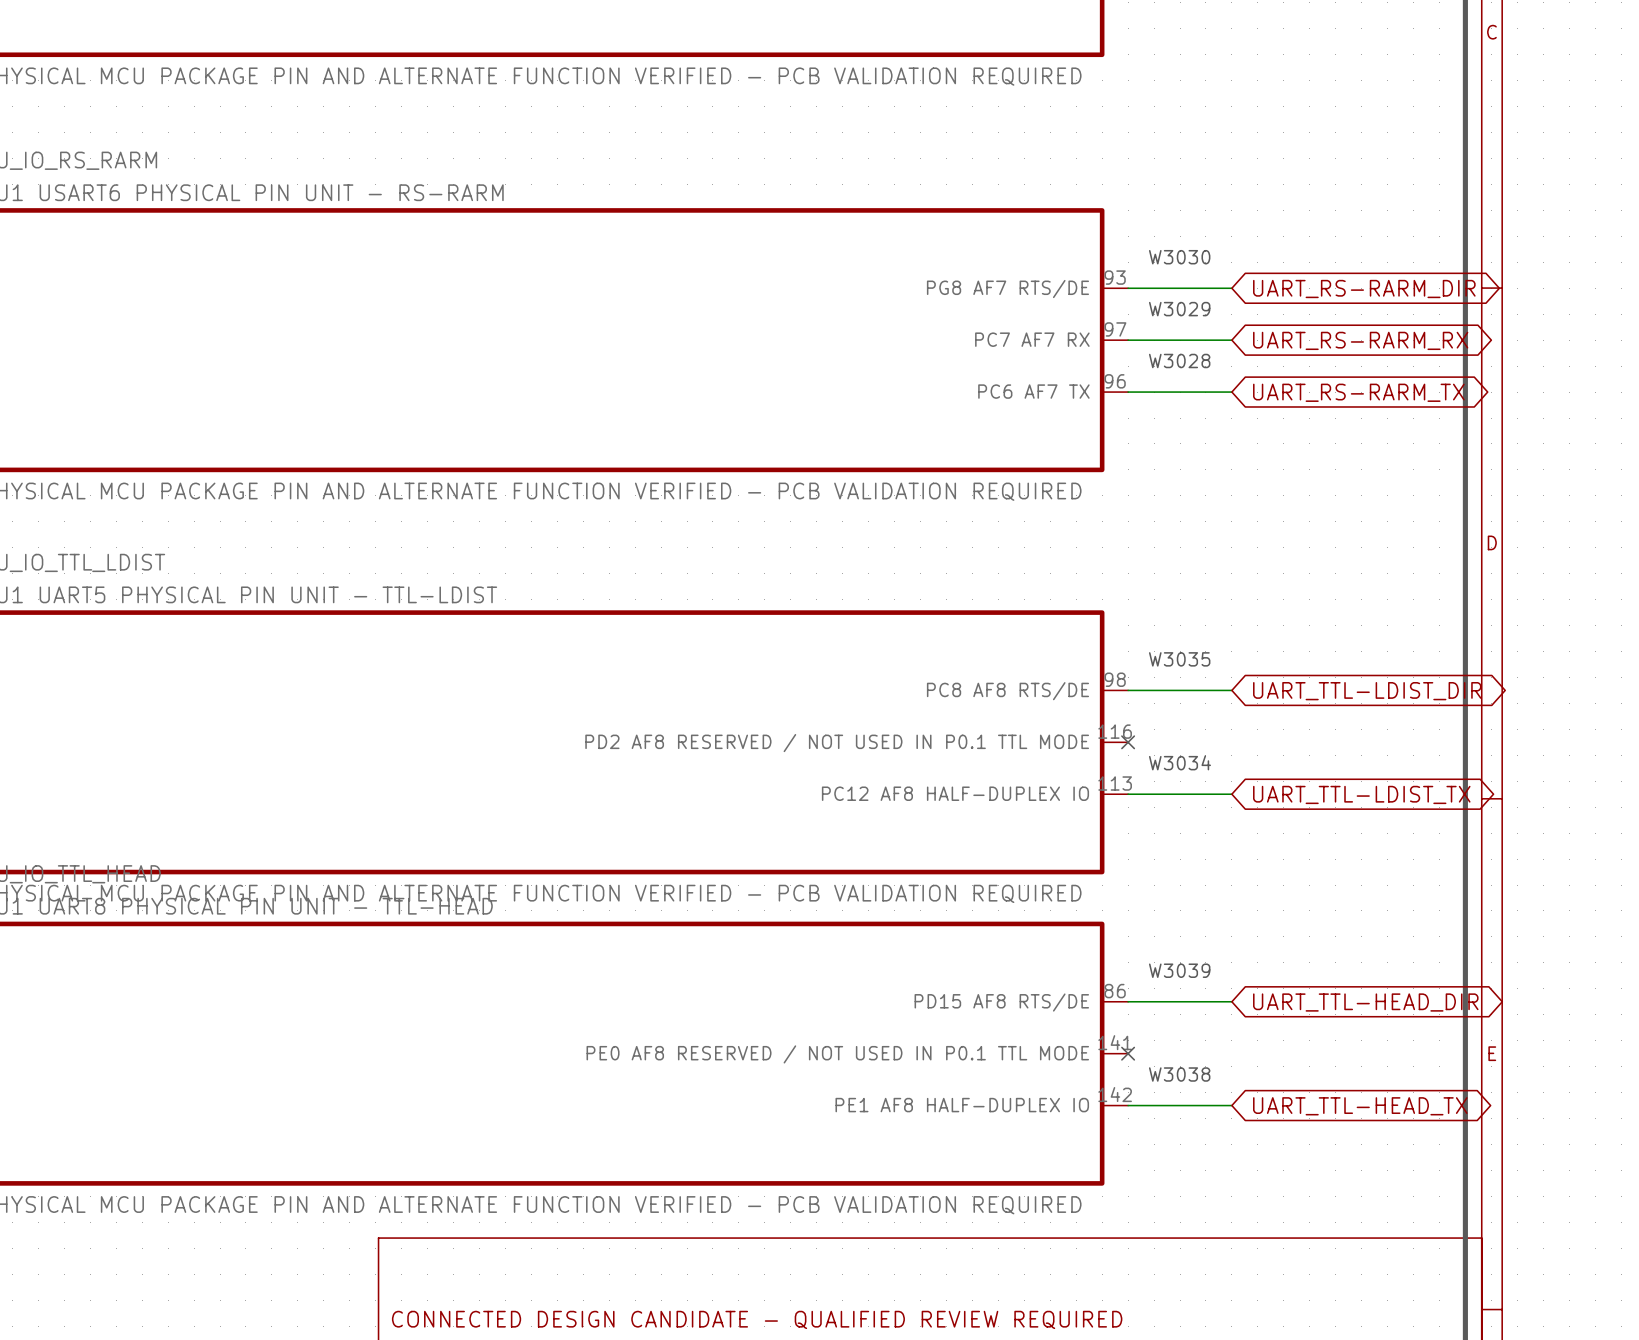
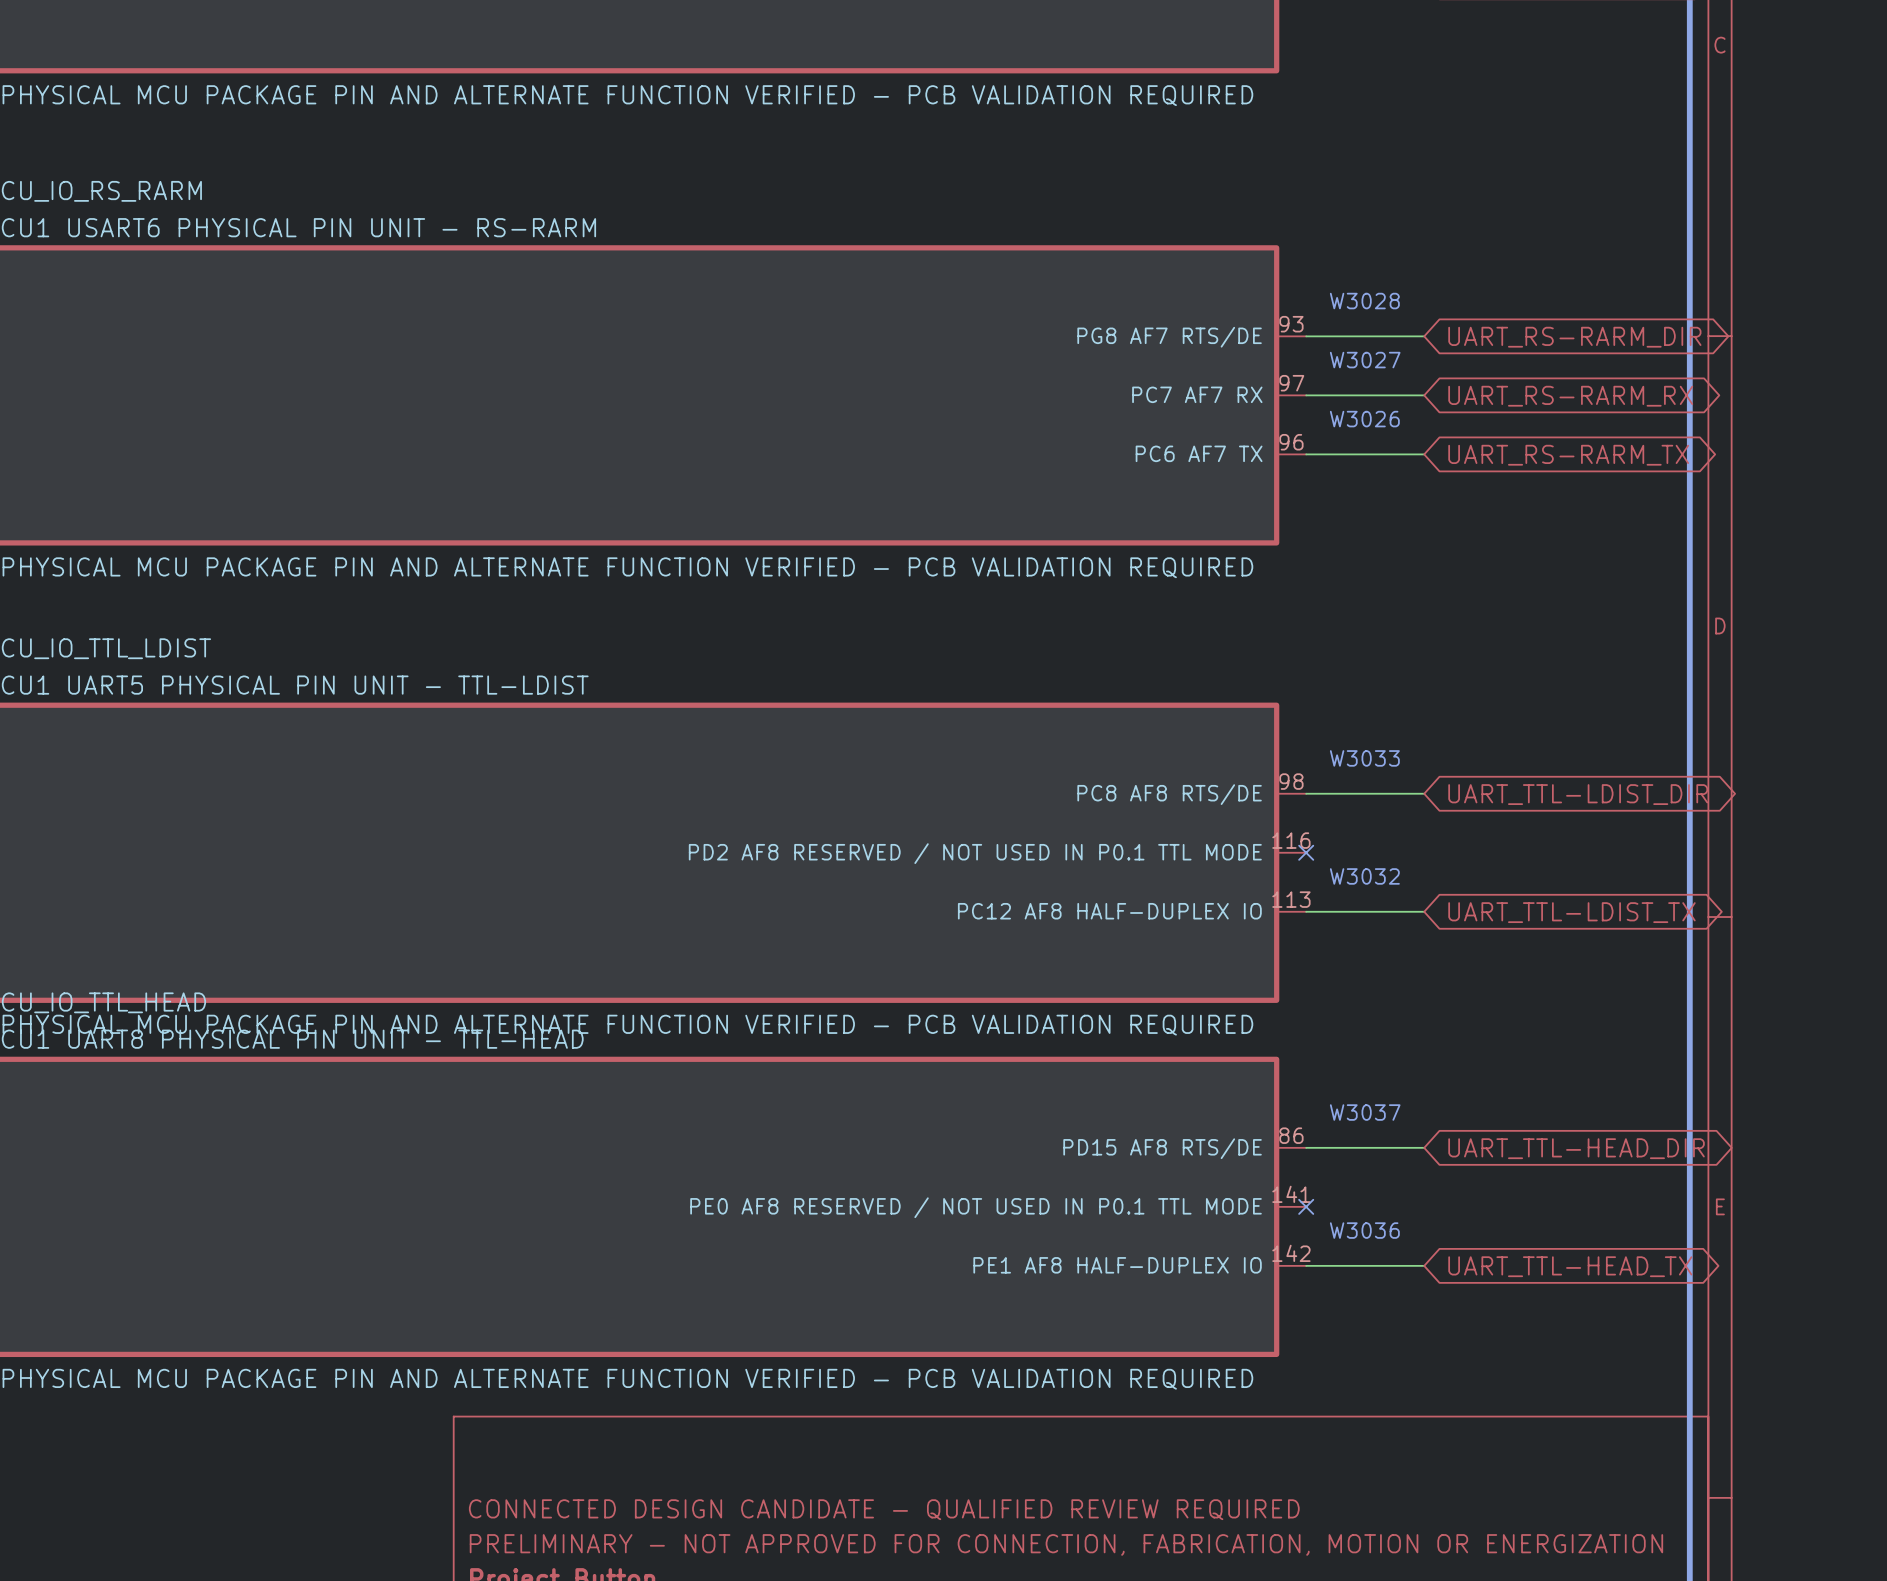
text: W3030 (1179, 257) -> W3028 (1364, 301)
text: W3029 (1179, 309) -> W3027 (1365, 360)
text: W3028 (1179, 360) -> W3026 (1364, 419)
text: W3035 (1179, 659) -> W3033 (1364, 758)
text: W3034 (1180, 762) -> W3032 (1364, 876)
text: W3039 (1179, 970) -> W3037 (1365, 1112)
text: W3038 (1179, 1074) -> W3036 (1364, 1230)

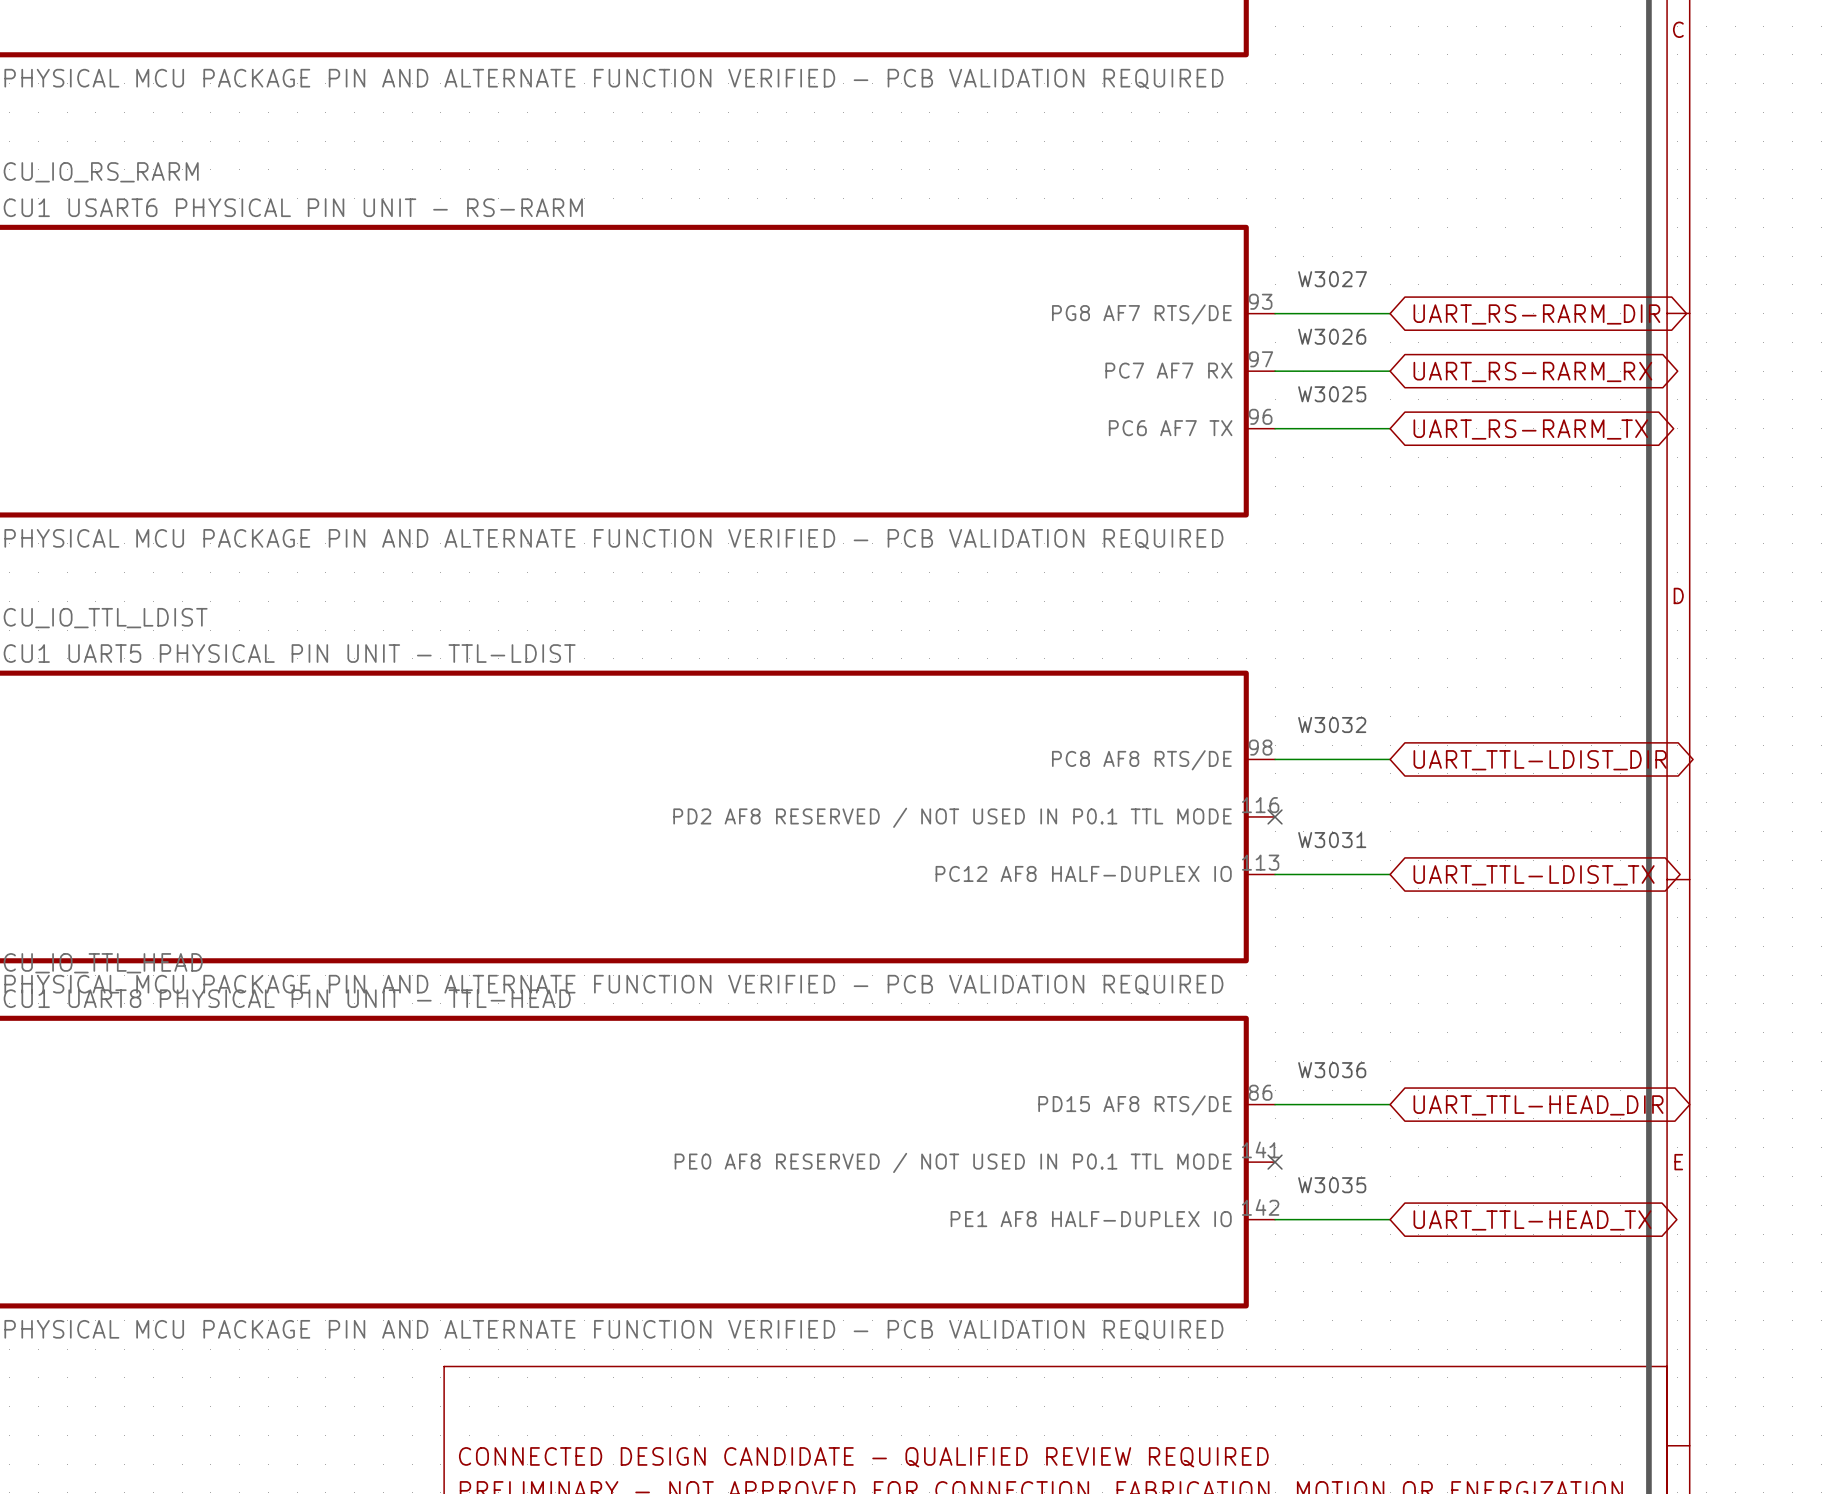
text: W3028 (1364, 301) -> W3027 (1332, 279)
text: W3027 (1365, 360) -> W3026 (1332, 336)
text: W3026 (1364, 419) -> W3025 (1332, 394)
text: W3033 (1364, 758) -> W3032 (1332, 725)
text: W3032 (1364, 876) -> W3031 (1332, 840)
text: W3037 (1365, 1112) -> W3036 (1332, 1070)
text: W3036 (1364, 1230) -> W3035 (1332, 1185)

